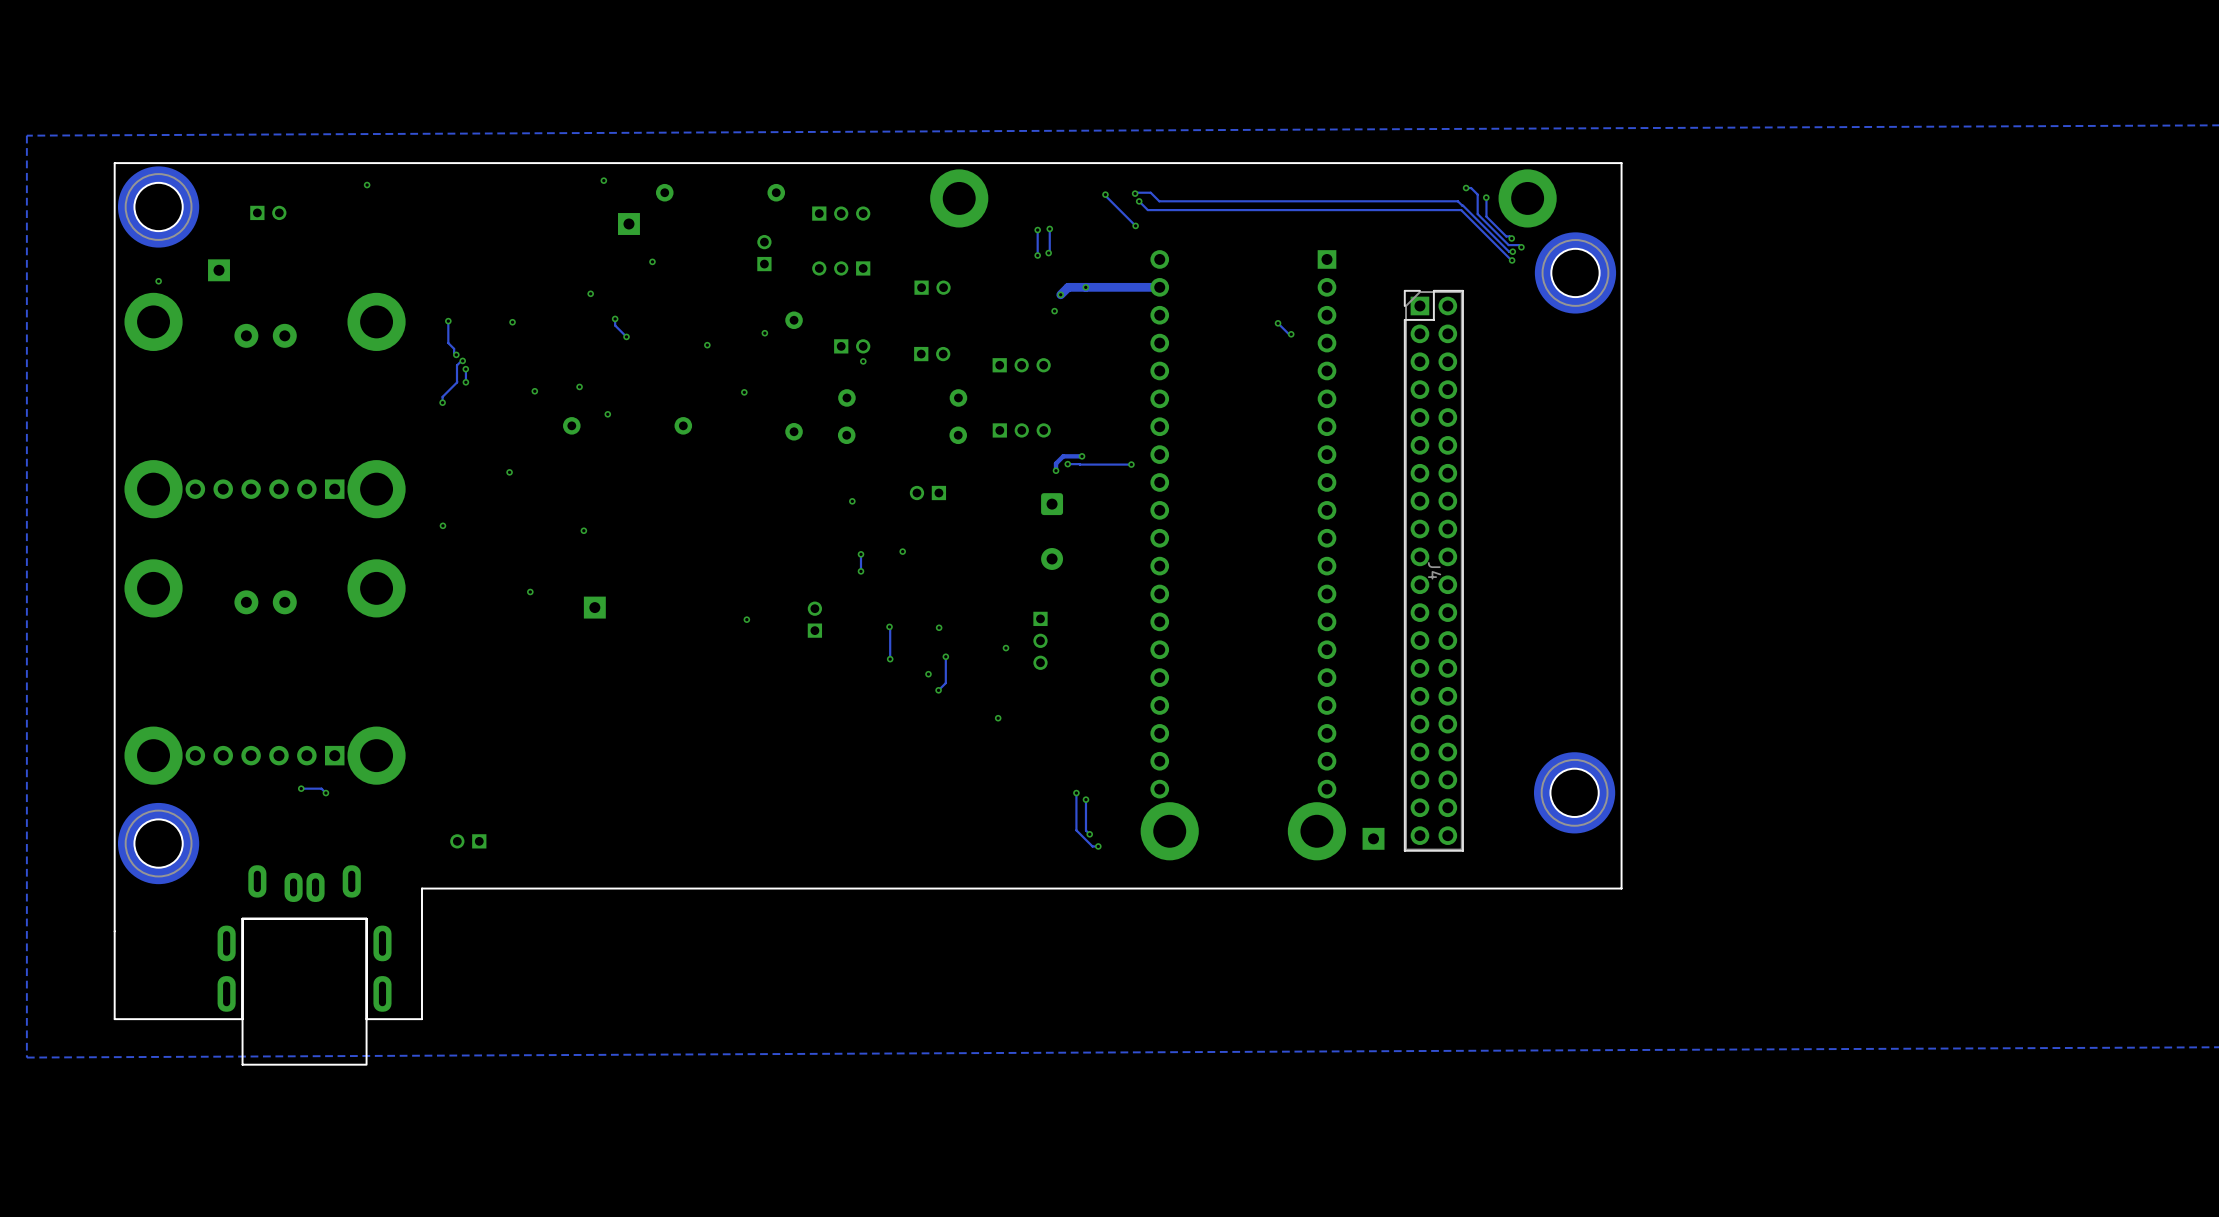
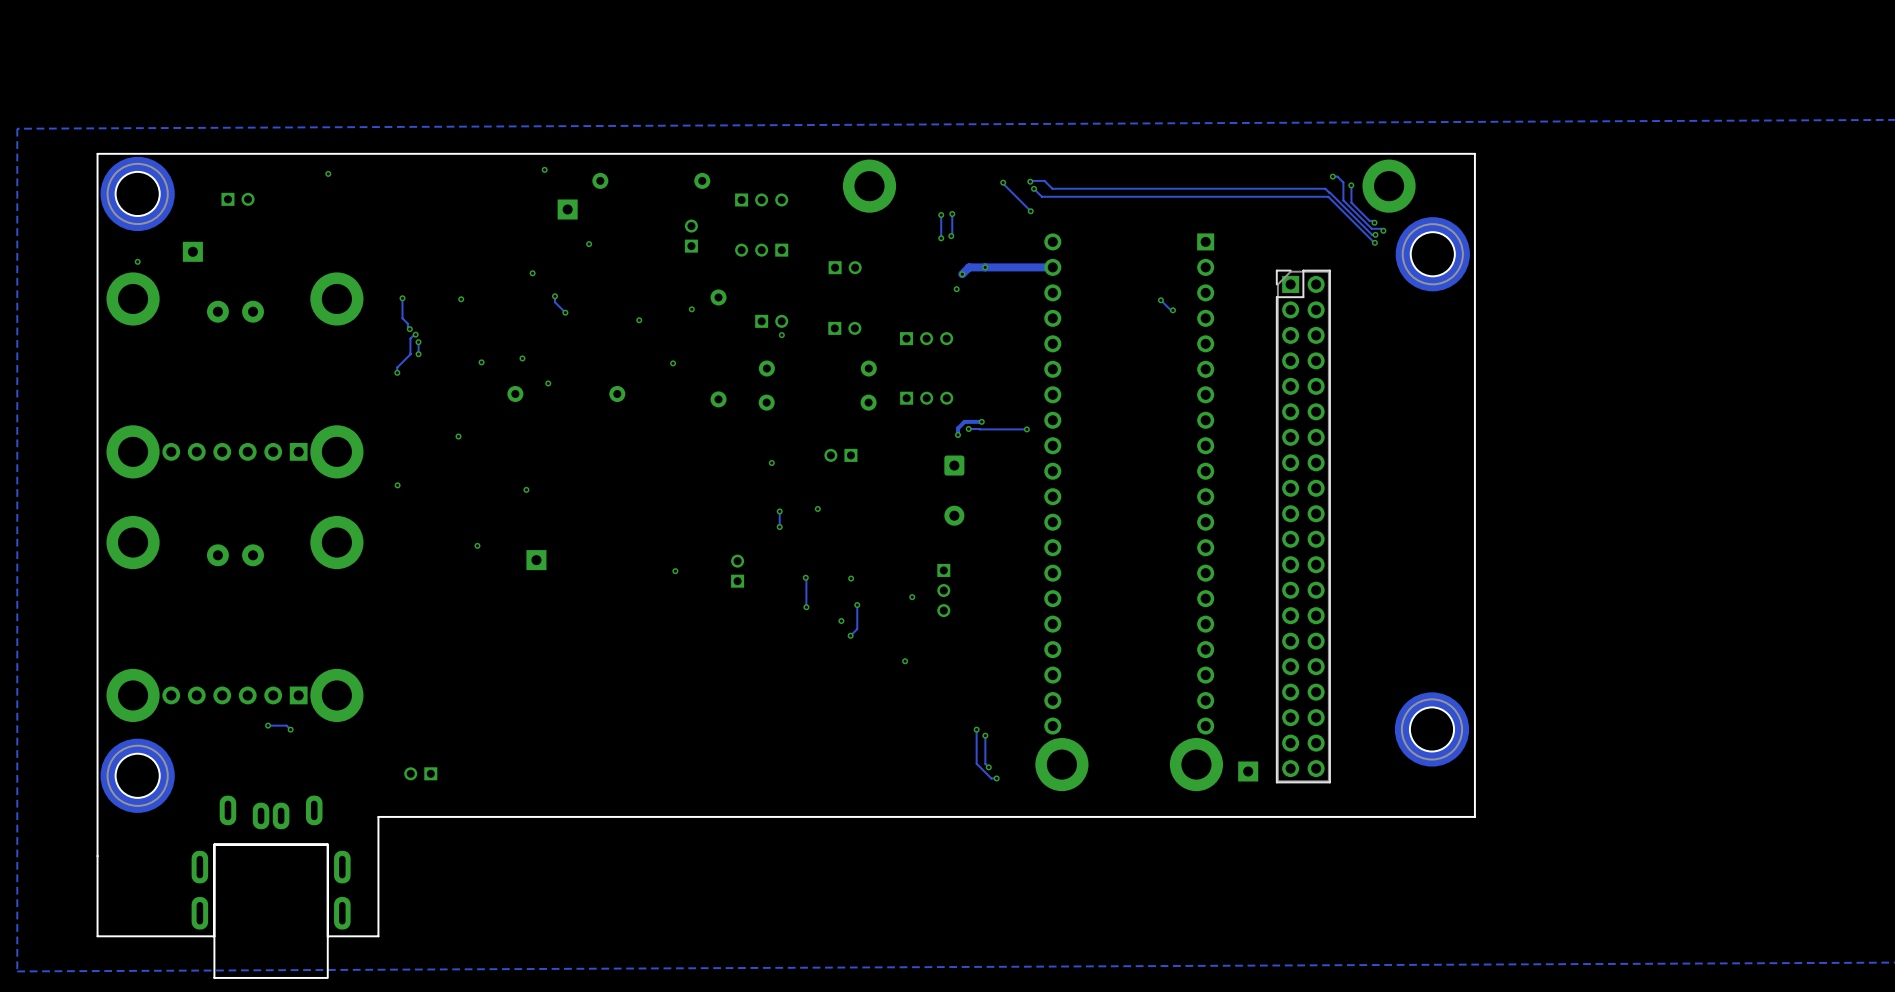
J4 name: J4 (1434, 570) -> none

